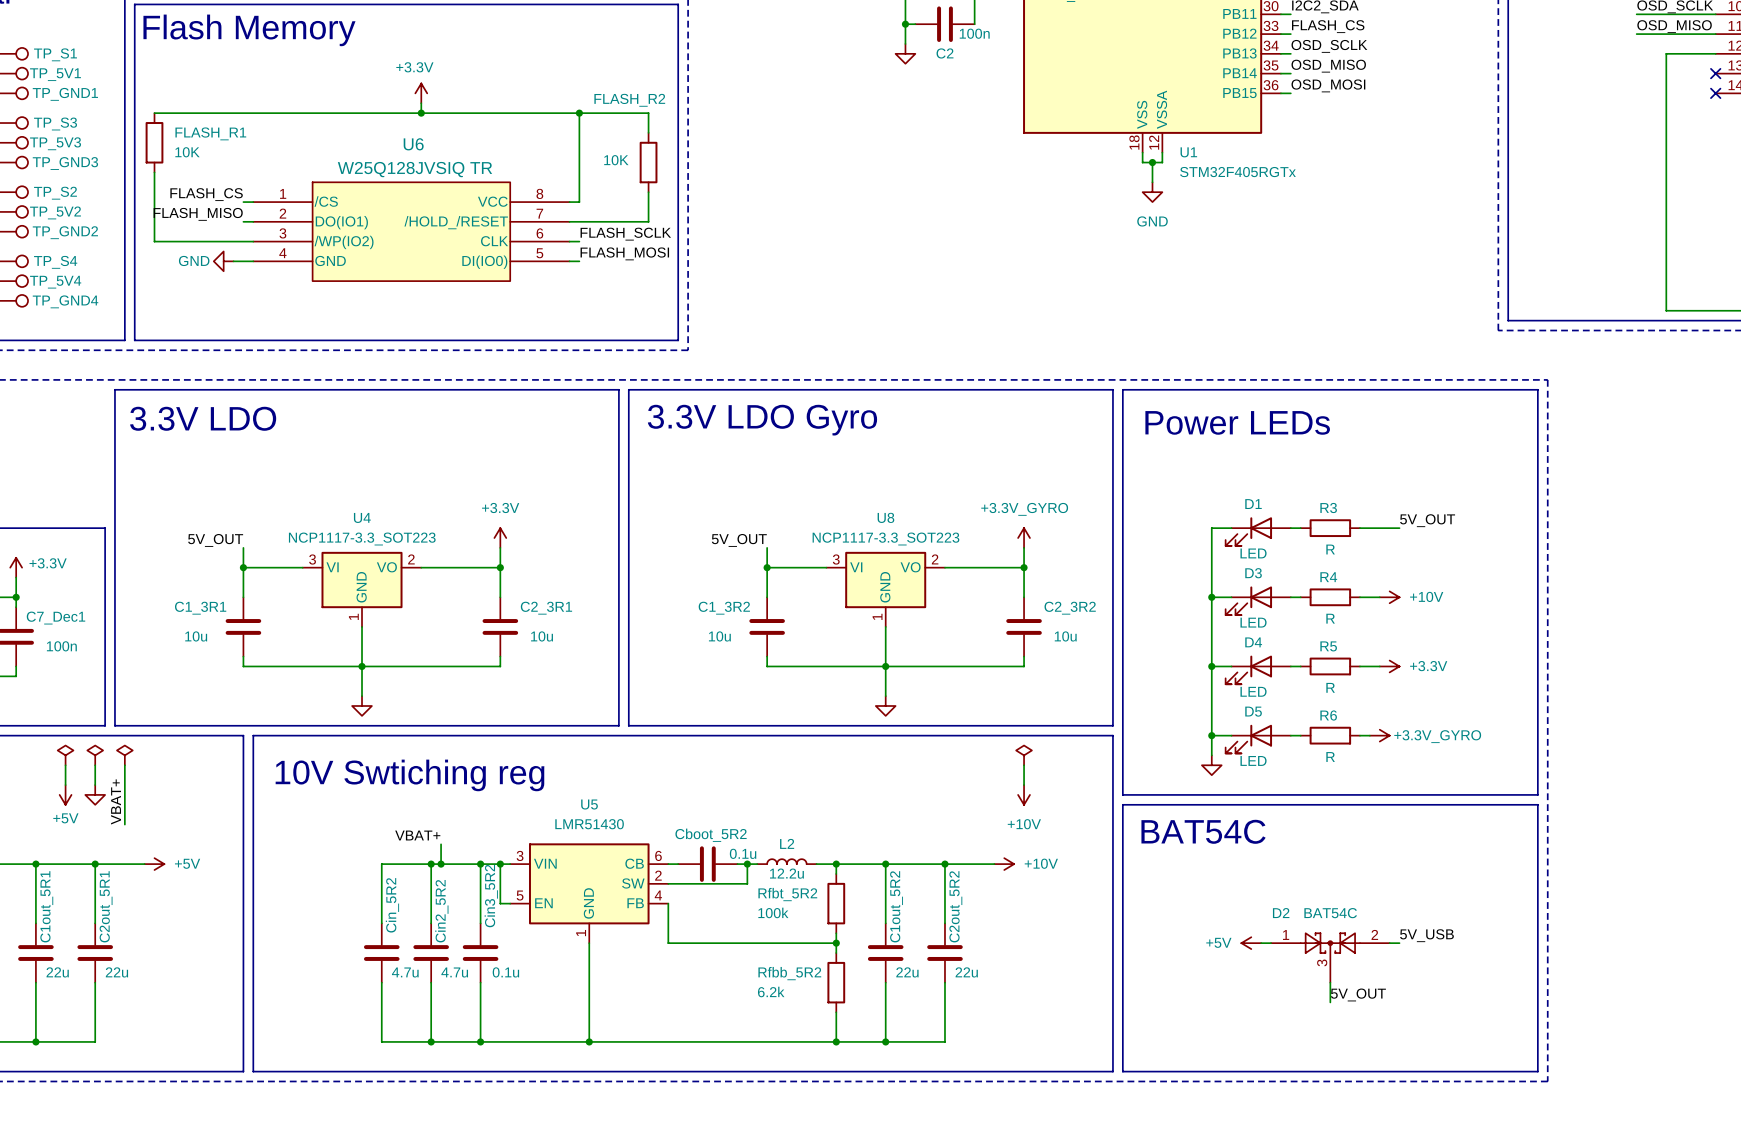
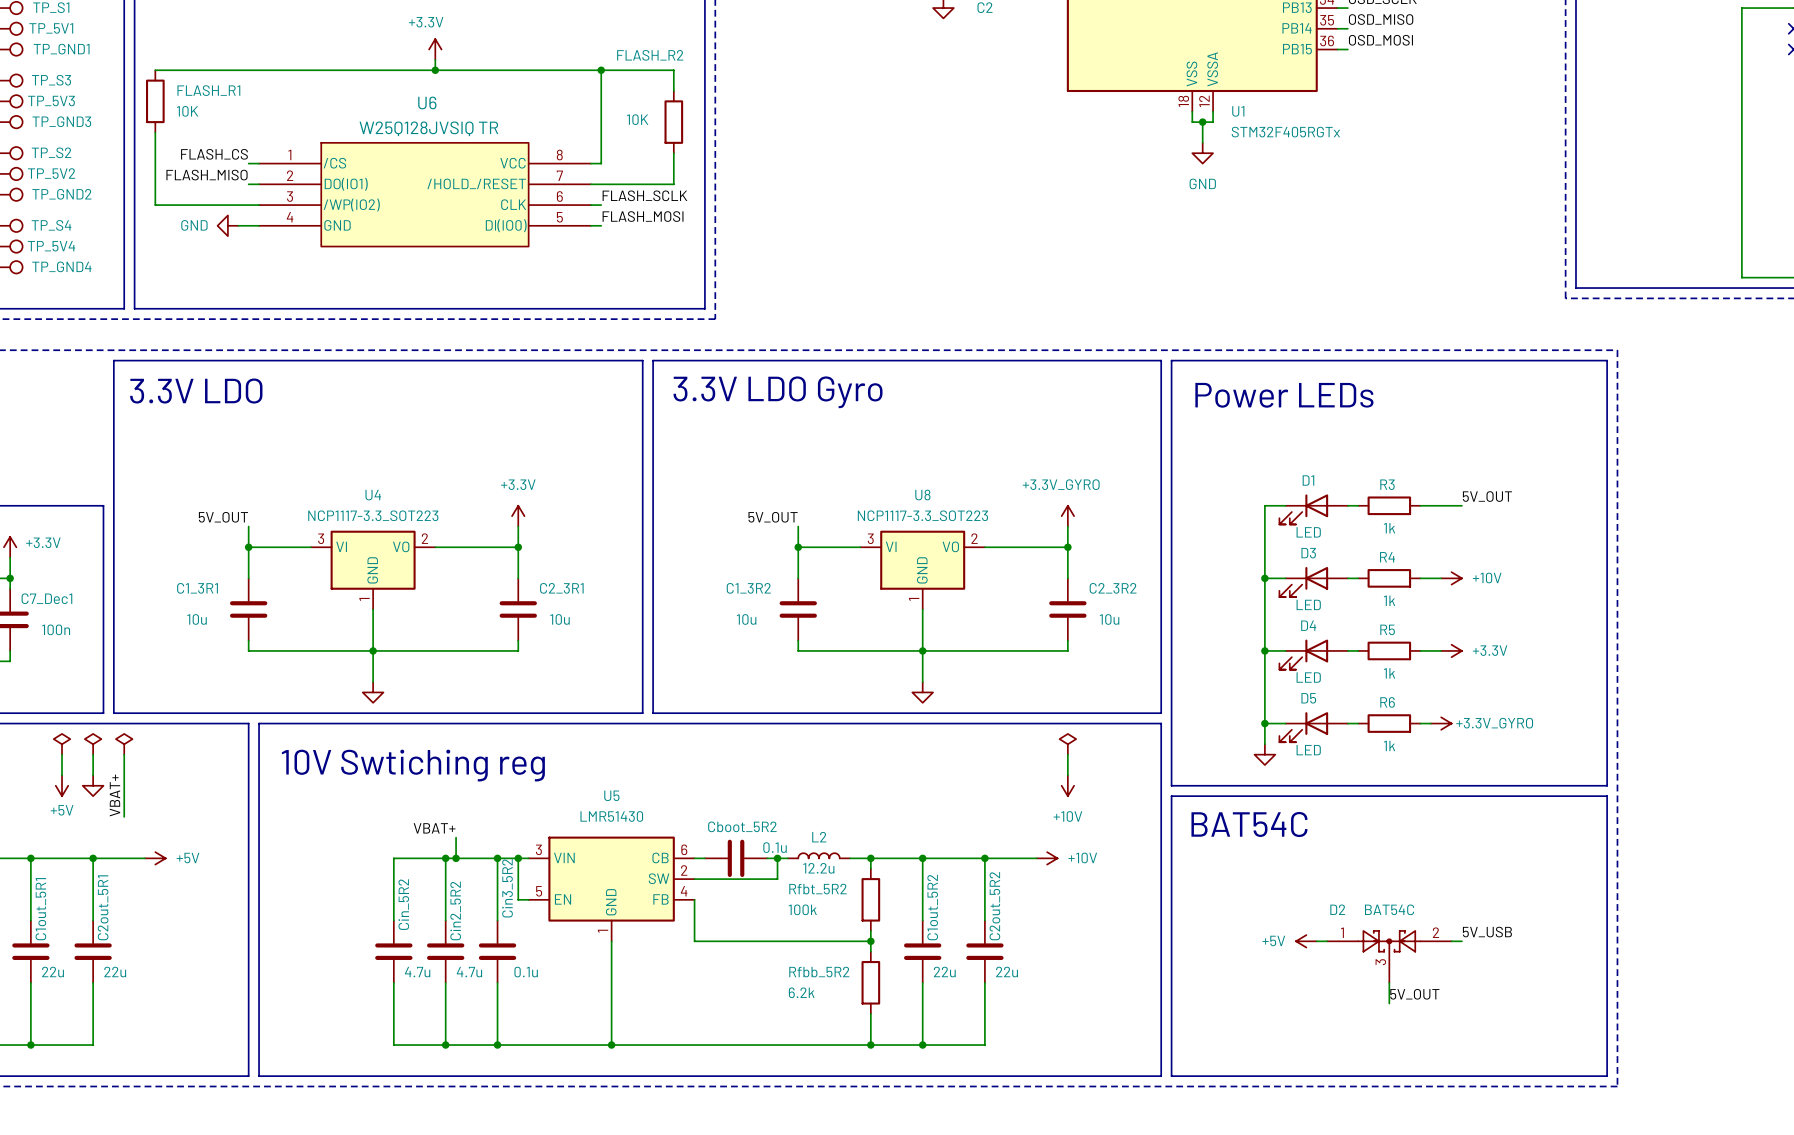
R3 value: R (1330, 549) -> 1k (1389, 528)
R4 value: R (1330, 618) -> 1k (1389, 600)
R5 value: R (1330, 687) -> 1k (1389, 673)
R6 value: R (1330, 757) -> 1k (1389, 745)

